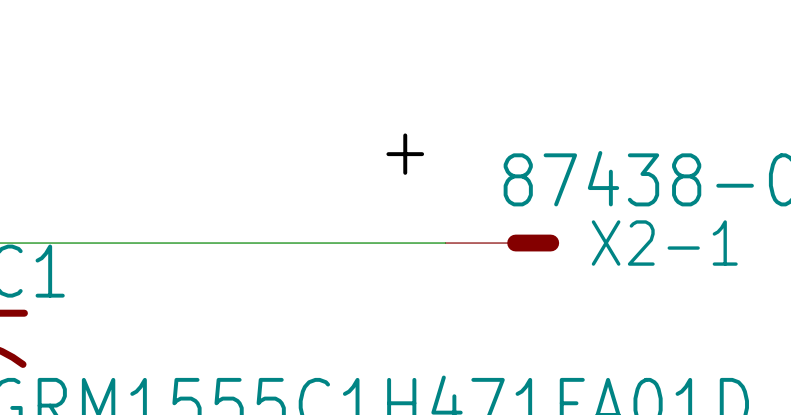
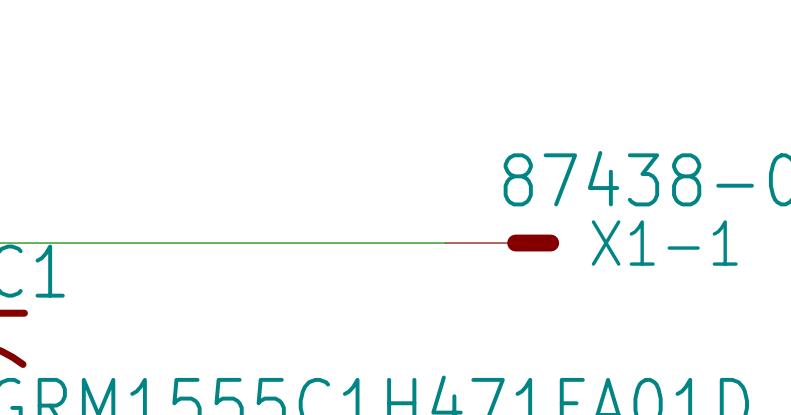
label: + (405, 154) -> none
X2-1 name: X2-1 (664, 243) -> X1-1 (664, 243)

